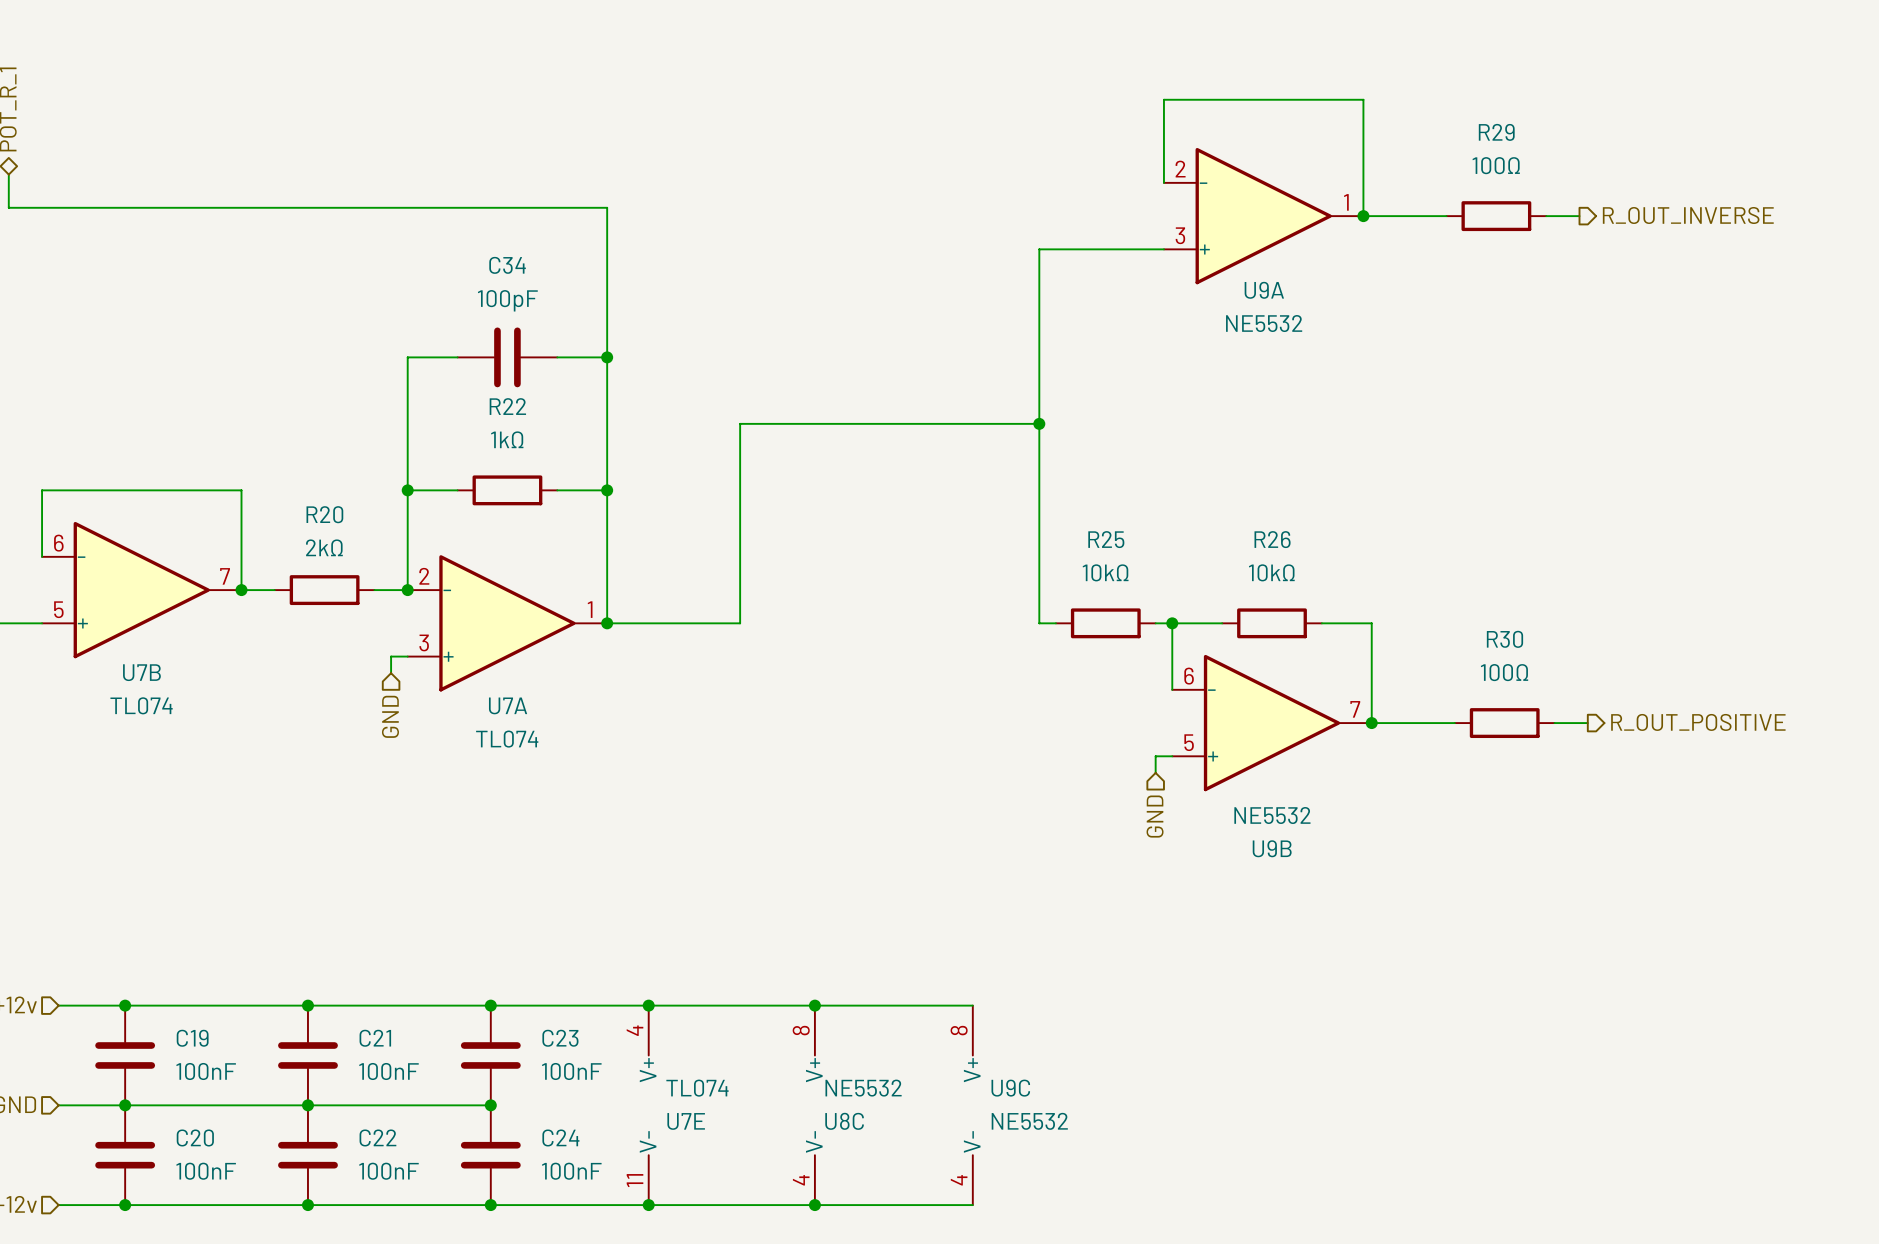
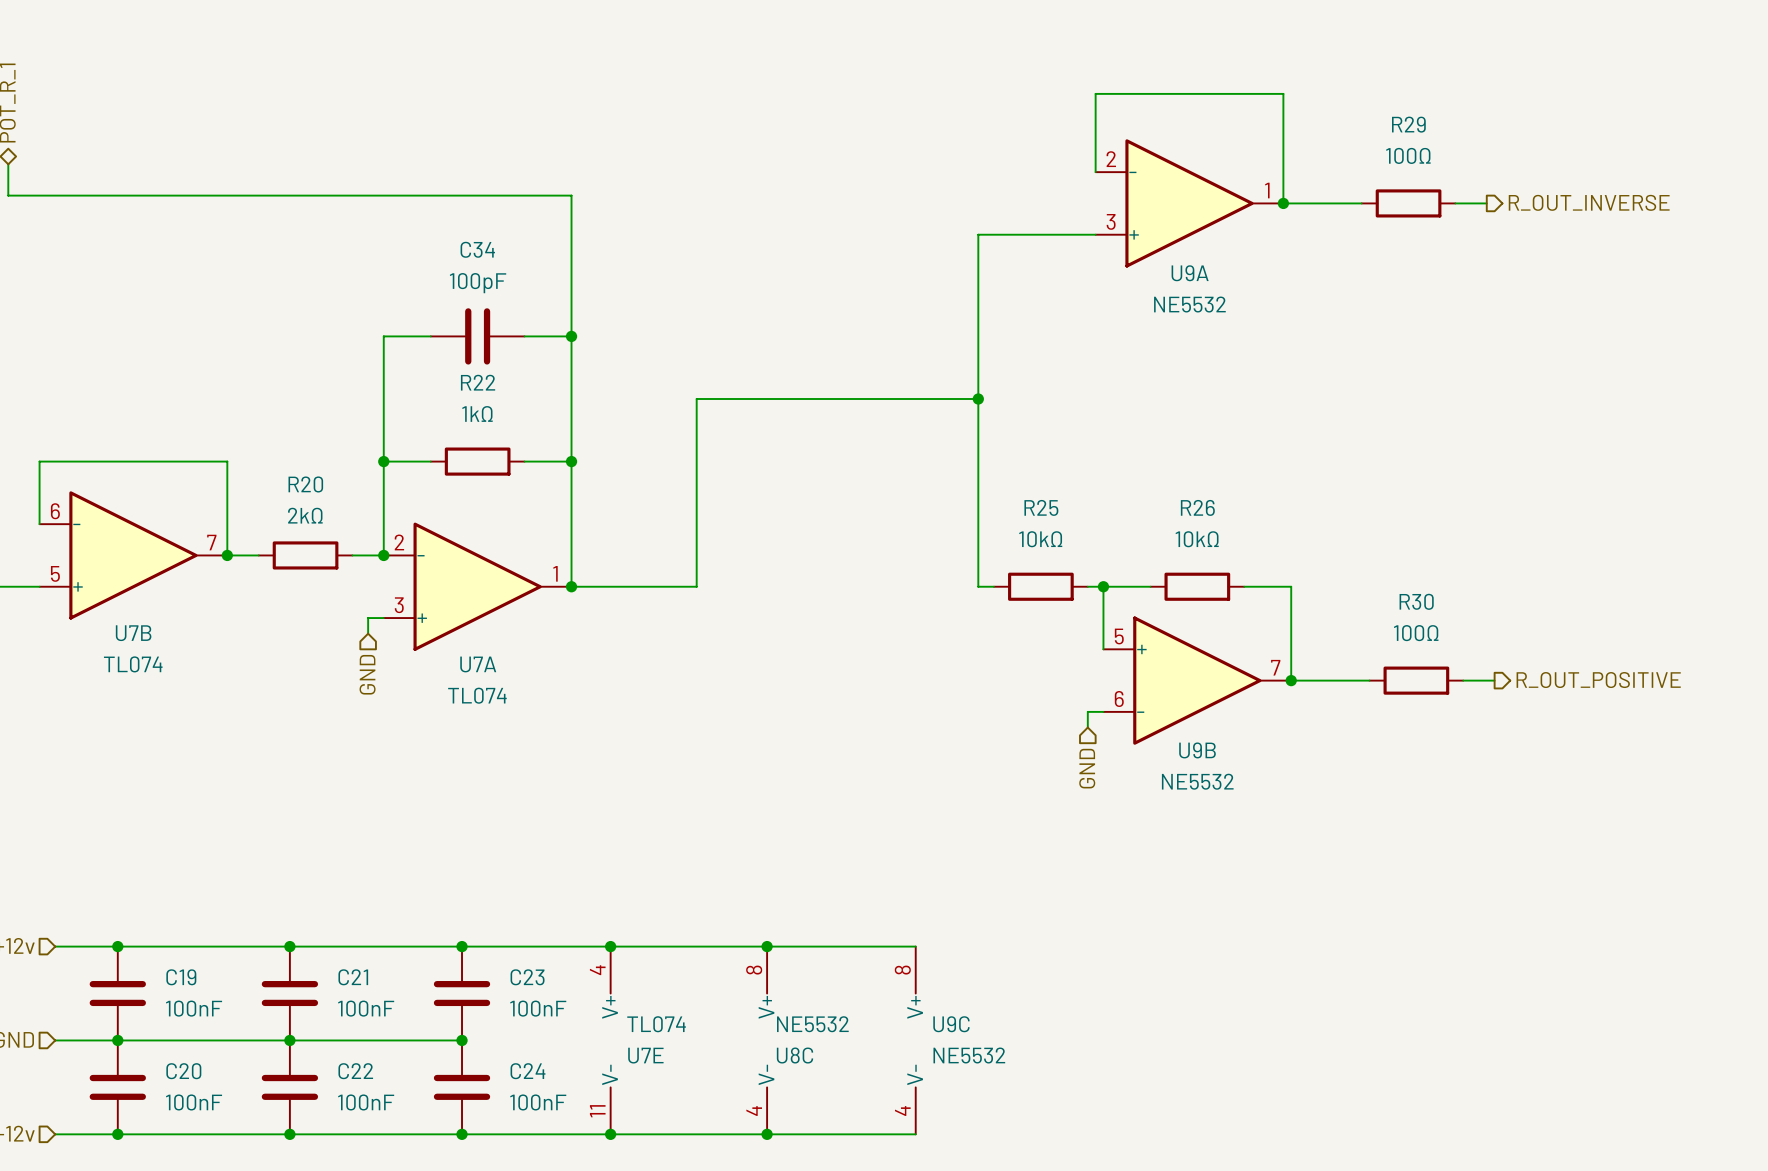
U9B flip: as is (1272, 723) -> up-down (1197, 680)
U9B name position: U9B (1272, 848) -> U9B (1197, 750)

